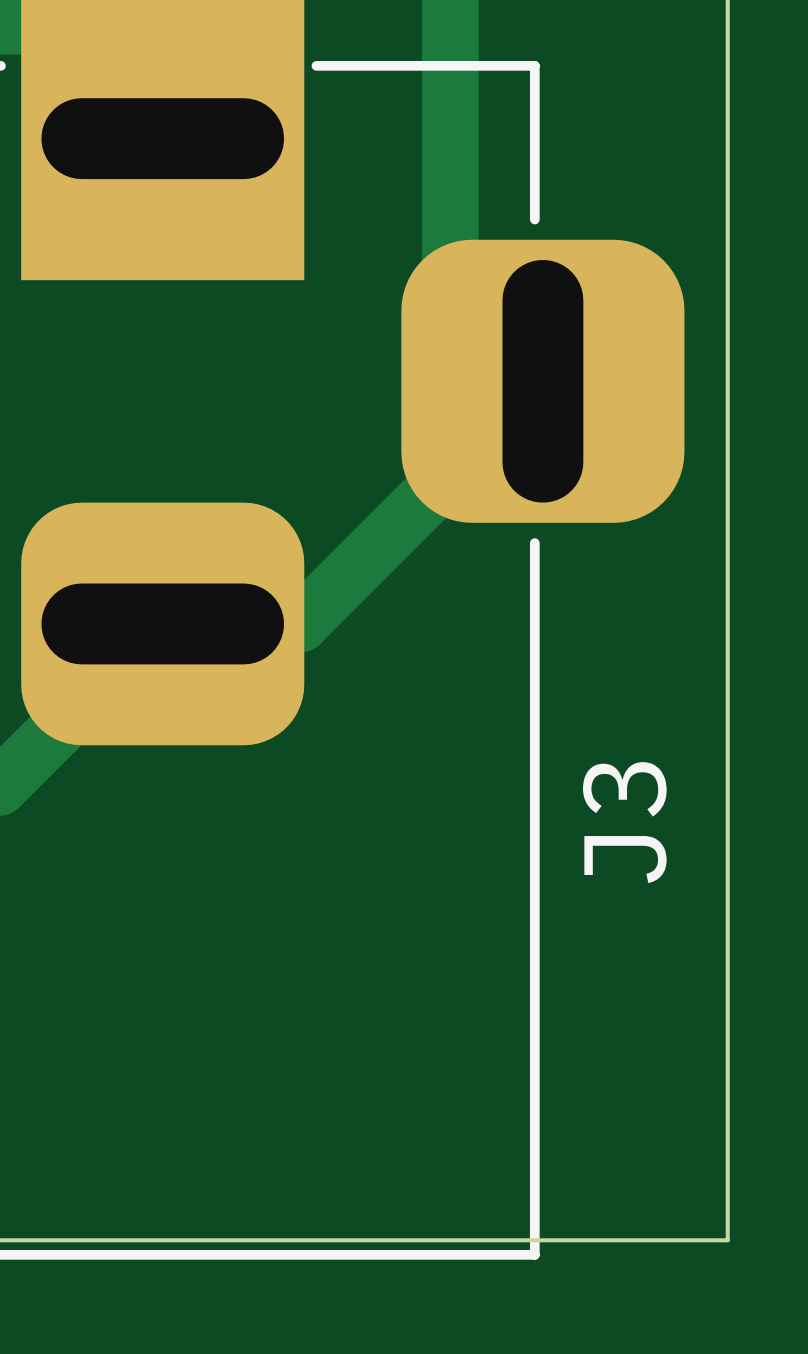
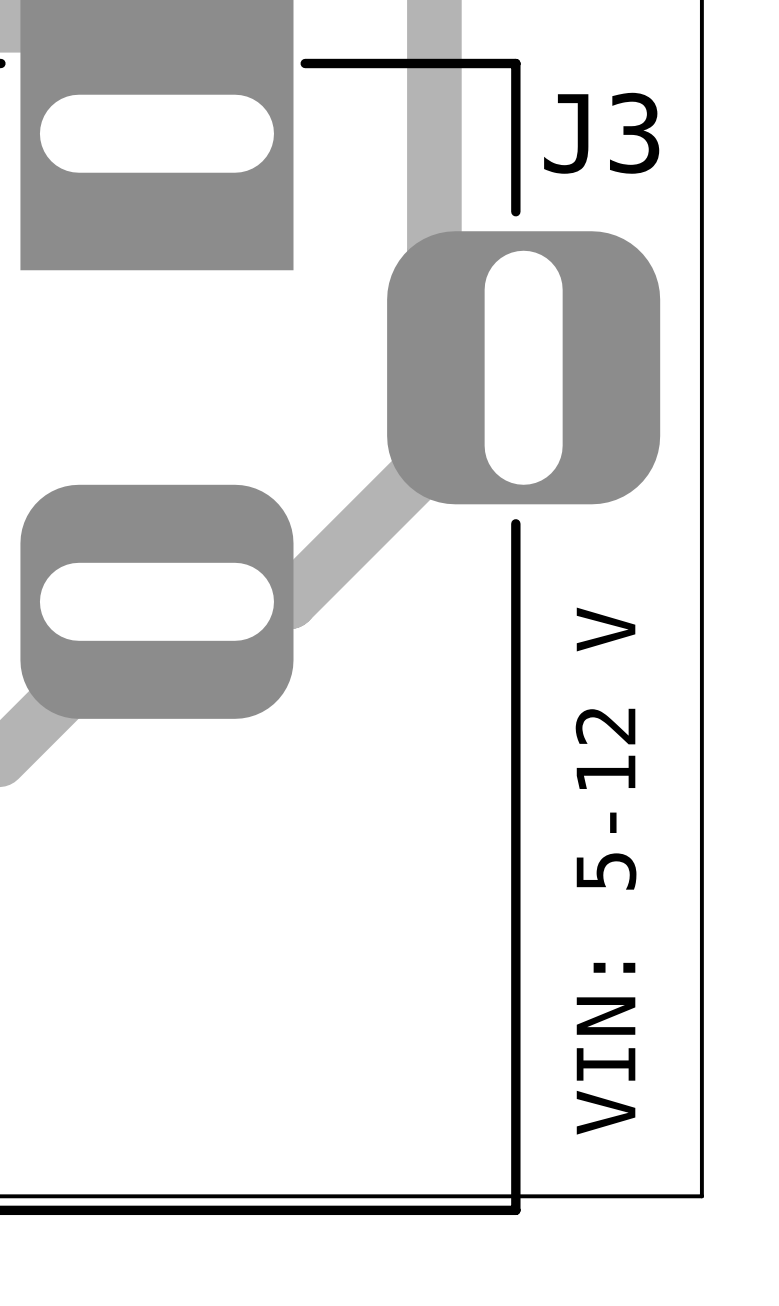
J3 name rotation: 0° (624, 822) -> 90° clockwise (601, 133)
J3 name position: J3 (624, 822) -> J3 (601, 133)
text: none -> VIN: 5-12 V (606, 871)

